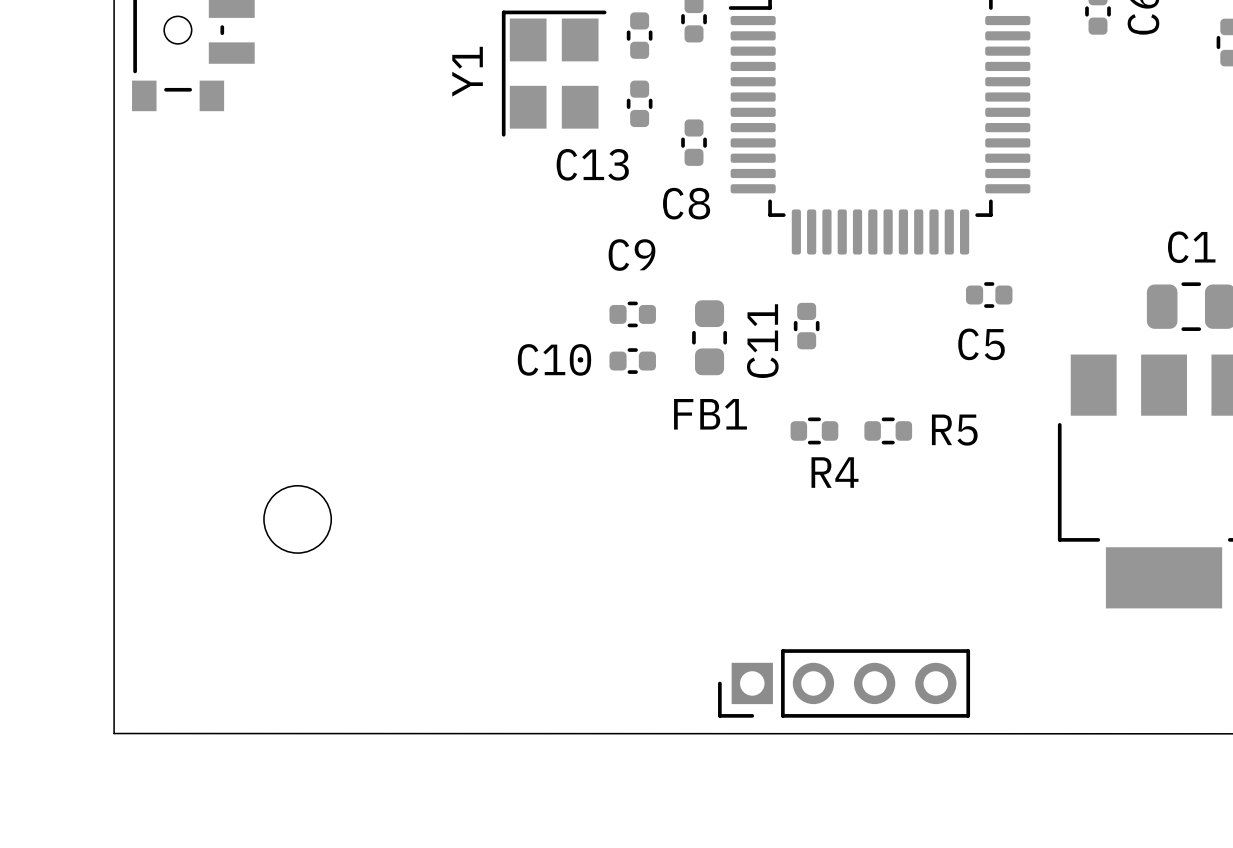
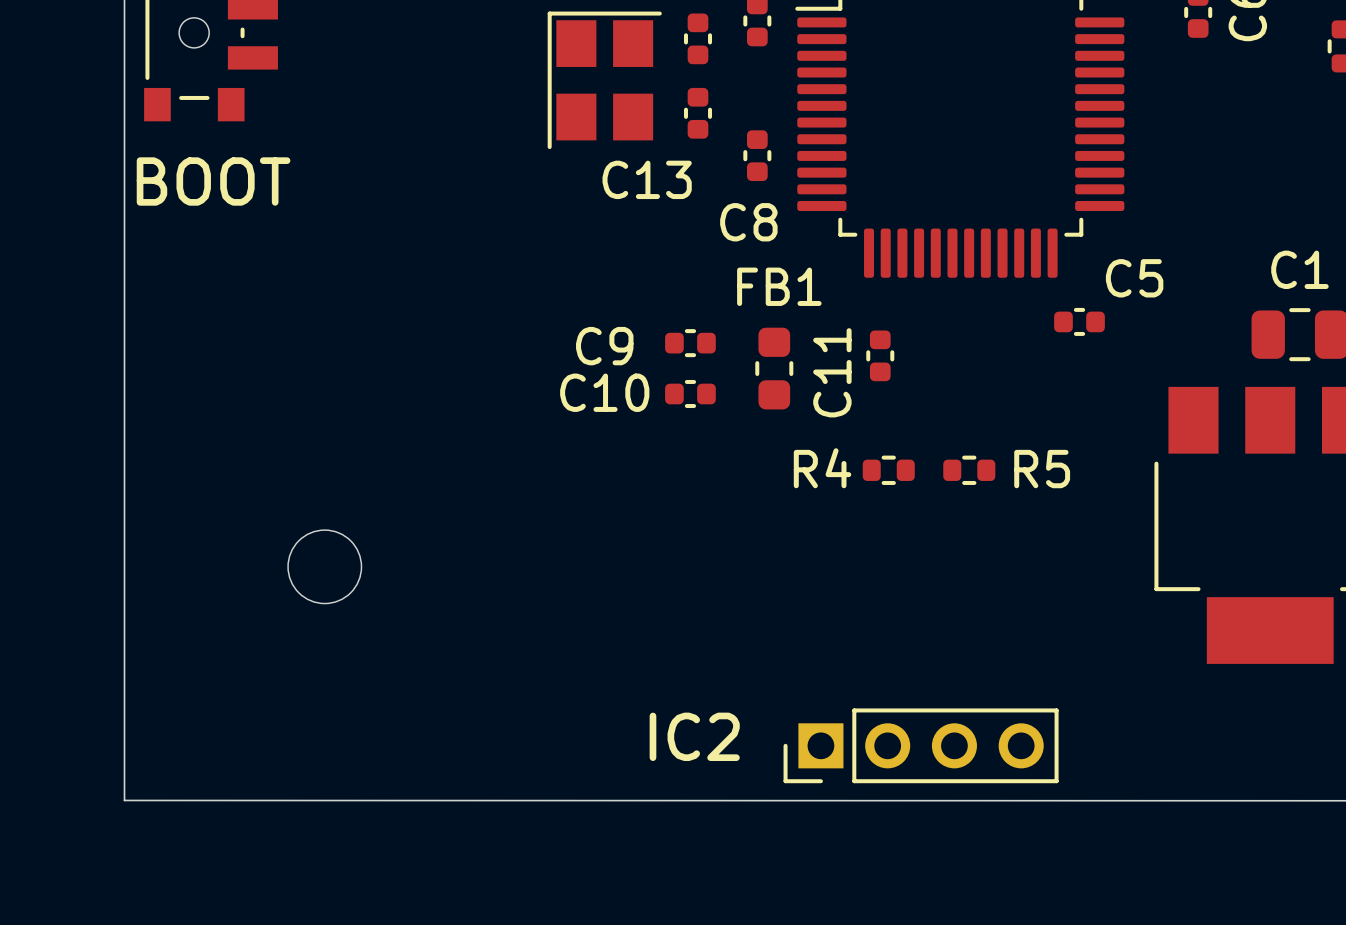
Y1 name: Y1 (467, 71) -> none
text: none -> BOOT (213, 181)
C9 name position: C9 (631, 255) -> C9 (604, 346)
C5 name position: C5 (981, 344) -> C5 (1134, 278)
FB1 name position: FB1 (710, 414) -> FB1 (779, 286)
R4 name position: R4 (835, 472) -> R4 (822, 468)
text: none -> IC2 (694, 736)

